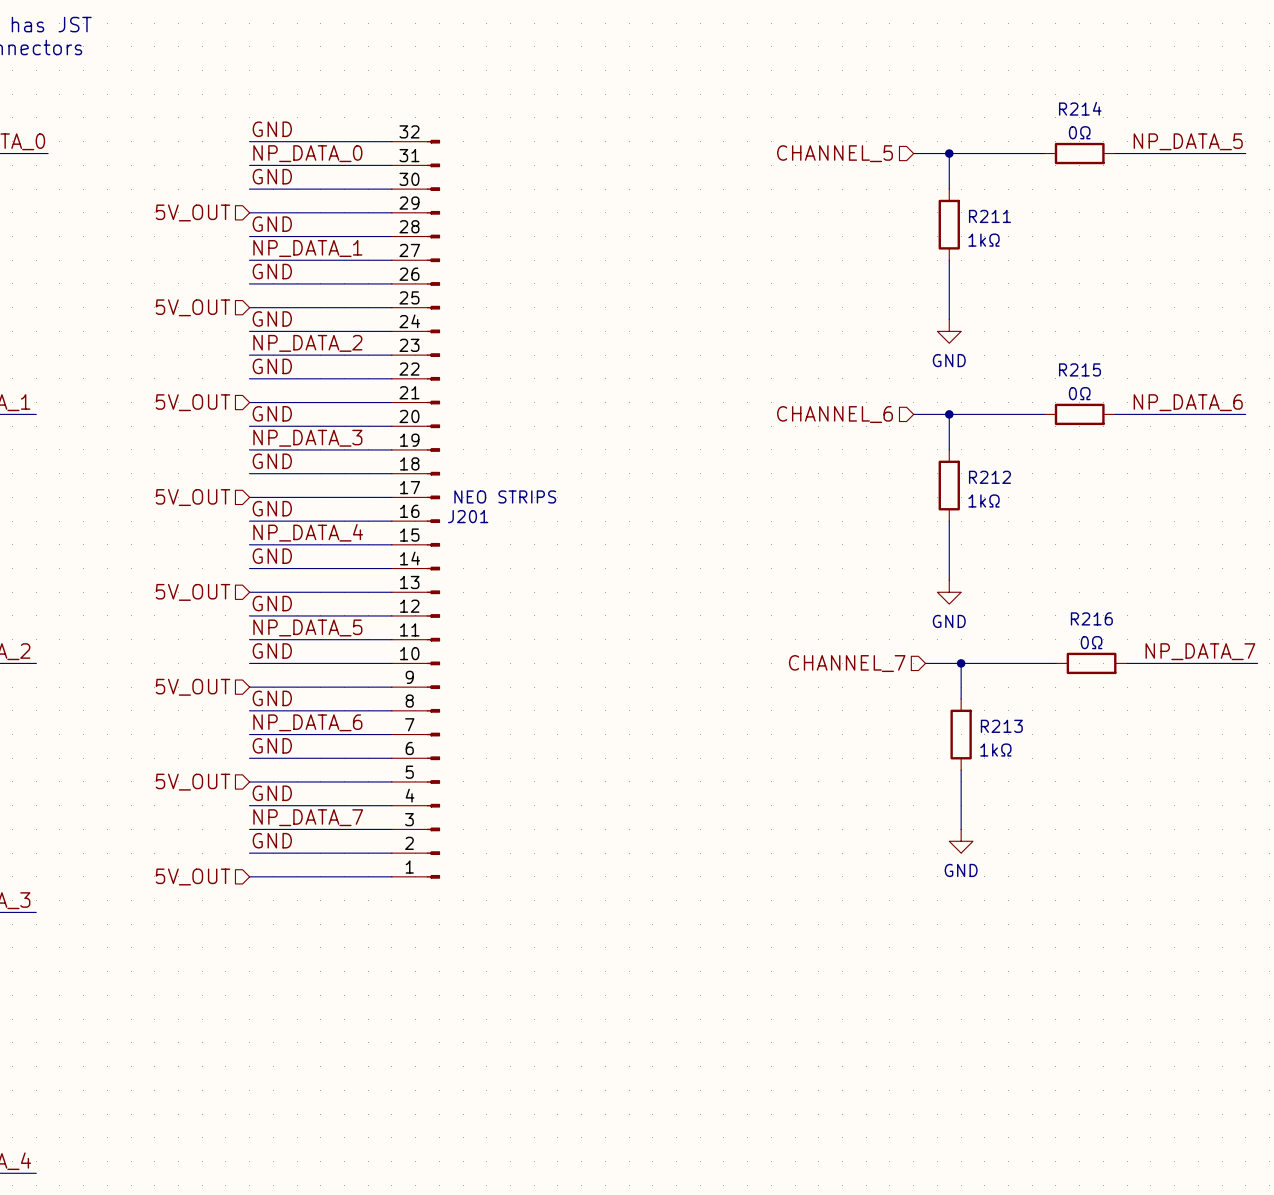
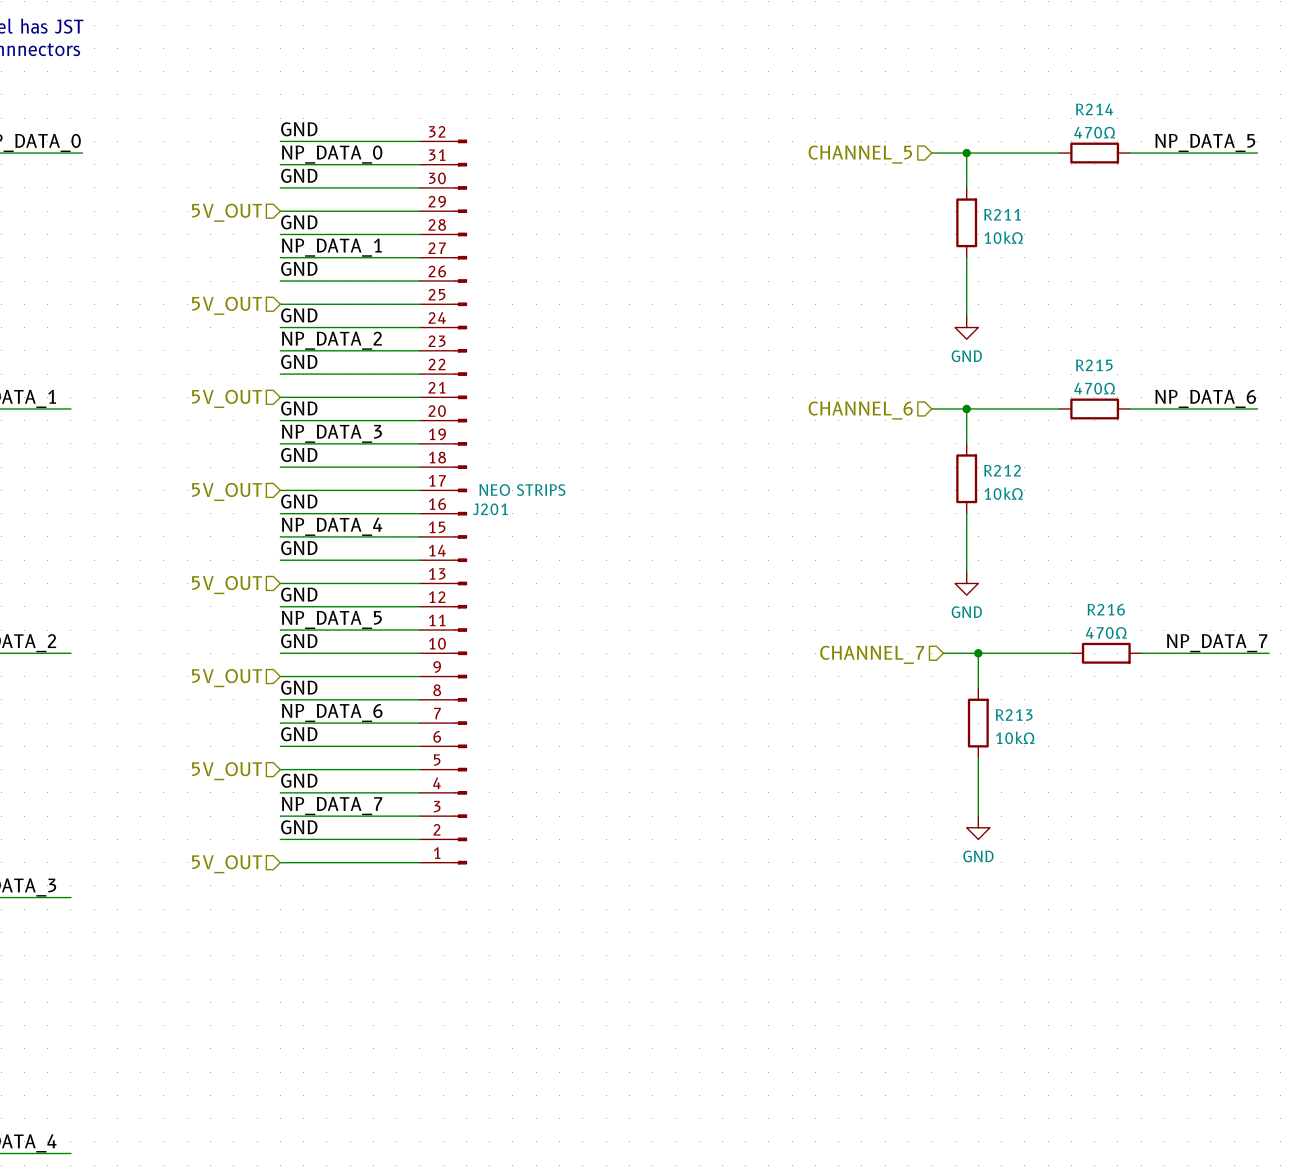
R214 value: 0Ω (1079, 132) -> 470Ω (1094, 132)
R211 value: 1kΩ (984, 240) -> 10kΩ (1003, 237)
R215 value: 0Ω (1079, 393) -> 470Ω (1094, 388)
R212 value: 1kΩ (984, 500) -> 10kΩ (1003, 493)
R216 value: 0Ω (1091, 642) -> 470Ω (1106, 632)
R213 value: 1kΩ (995, 750) -> 10kΩ (1015, 737)

